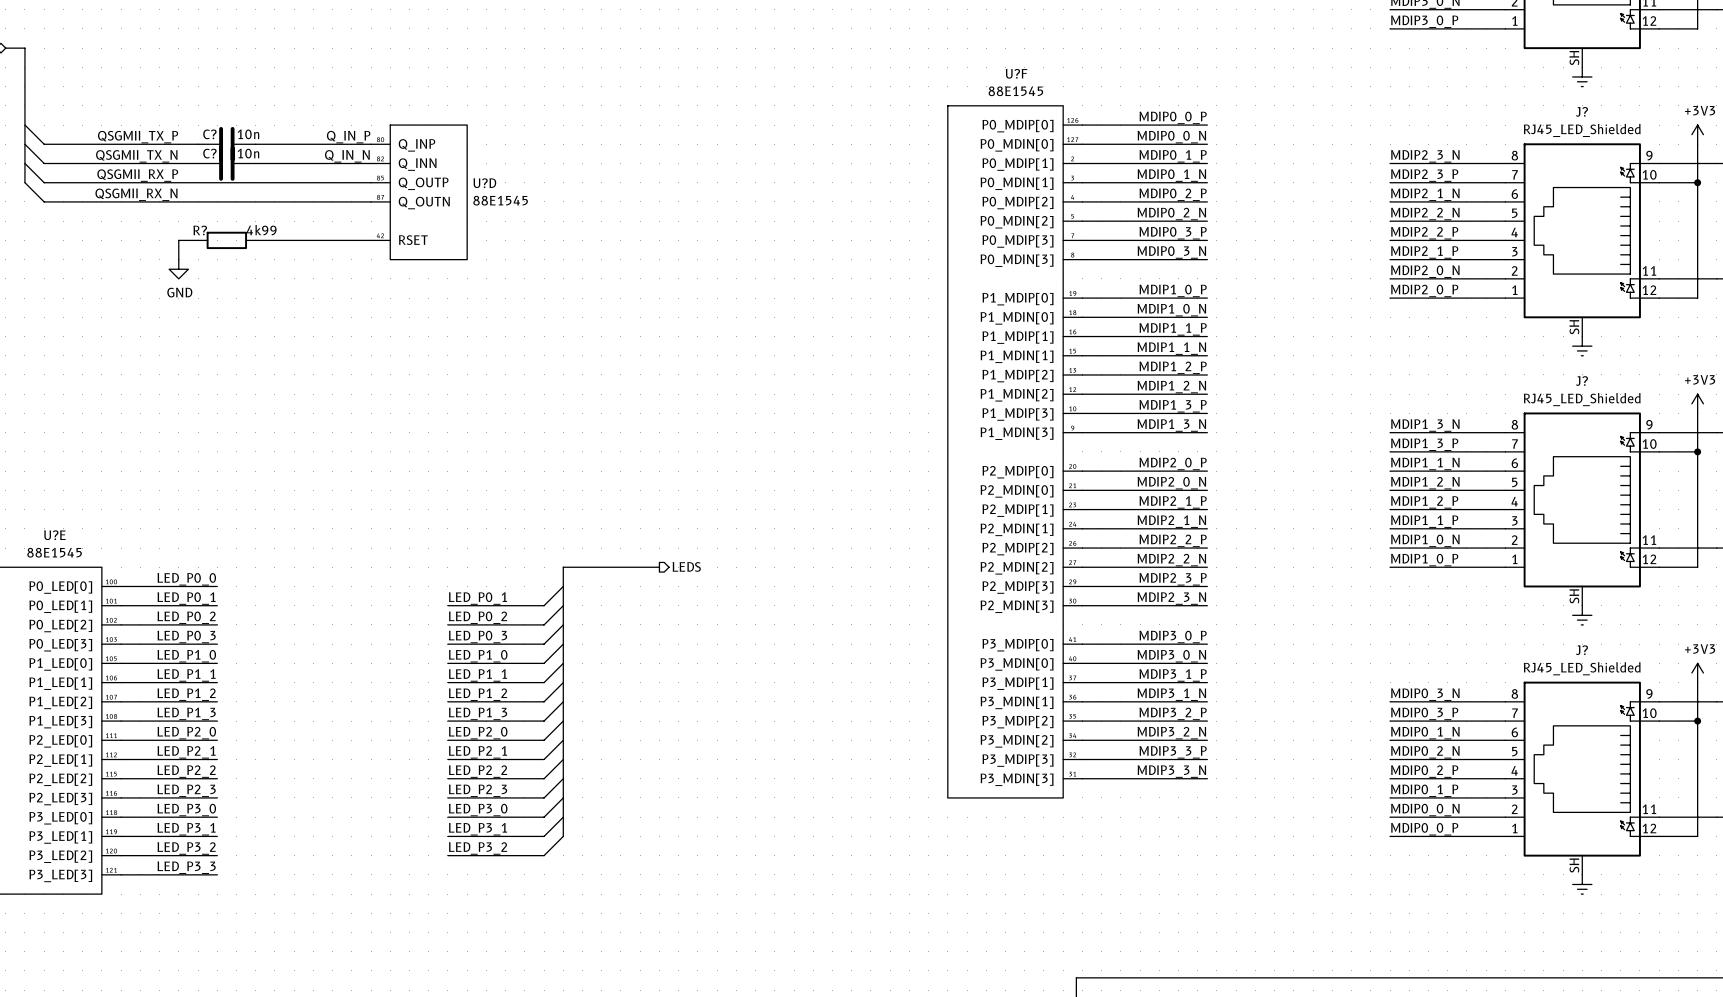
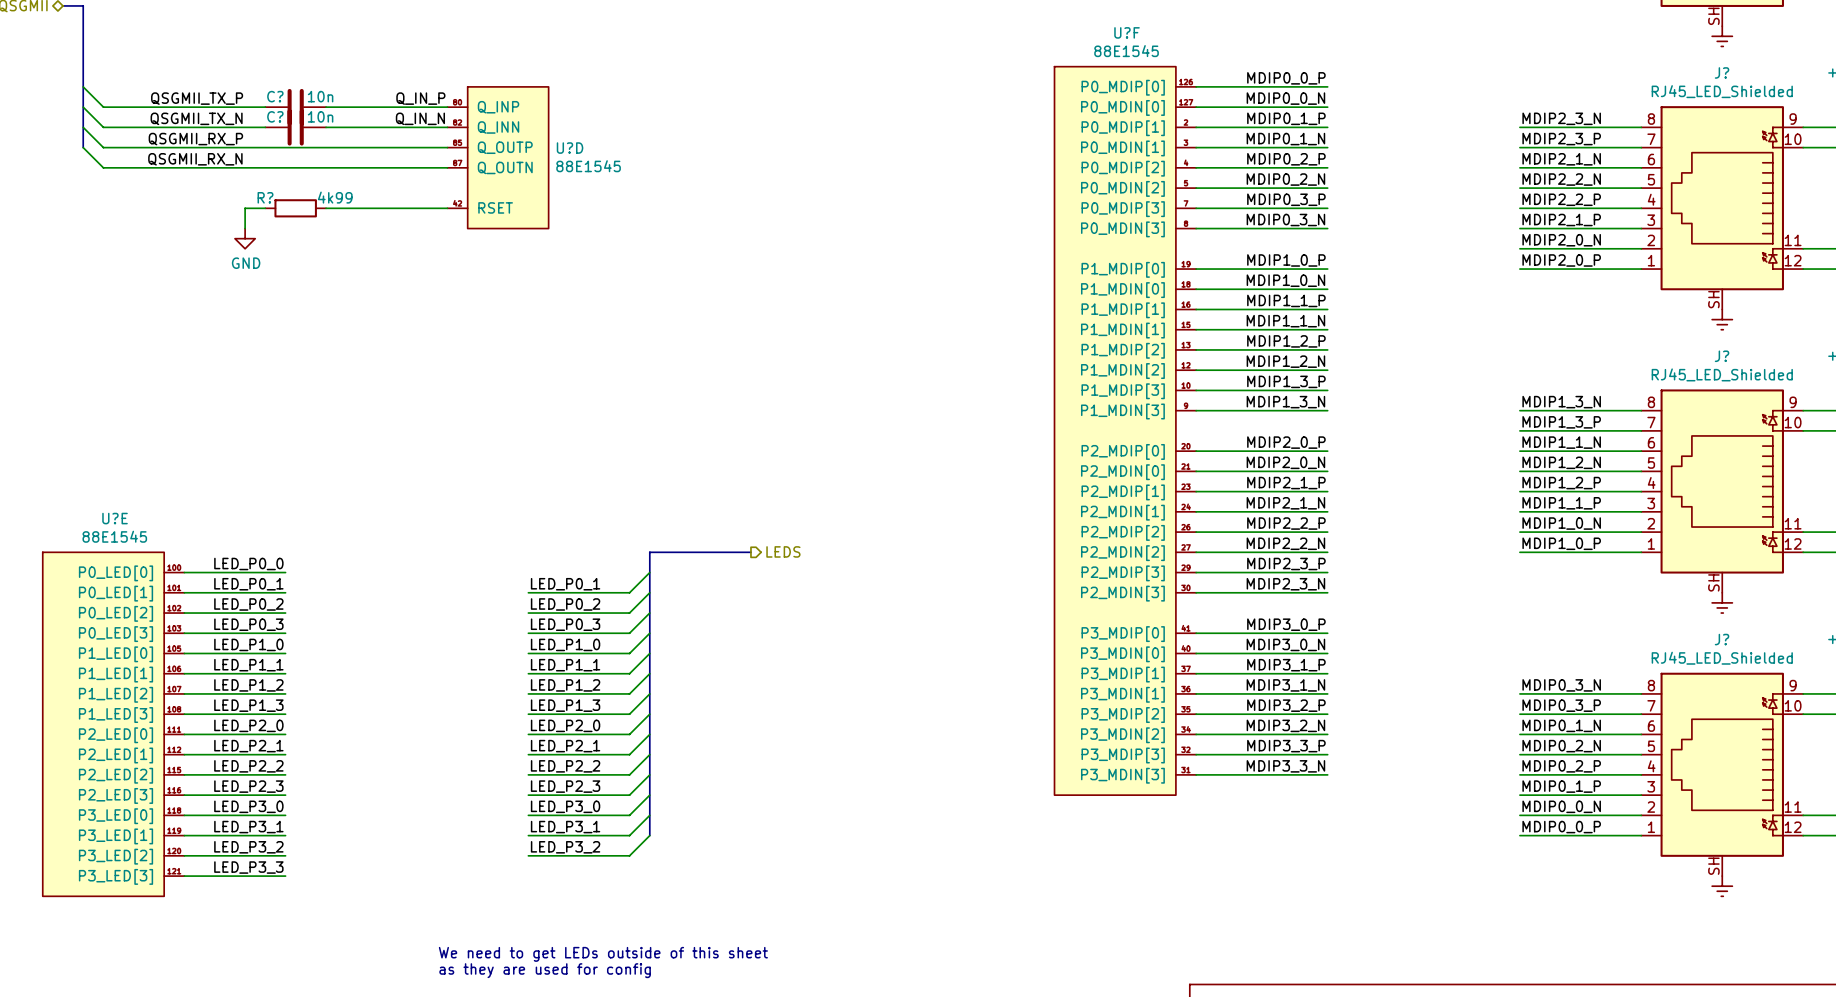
text: none -> We need to get LEDs outside of this sheet (603, 954)
text: none -> as they are used for config (545, 970)

